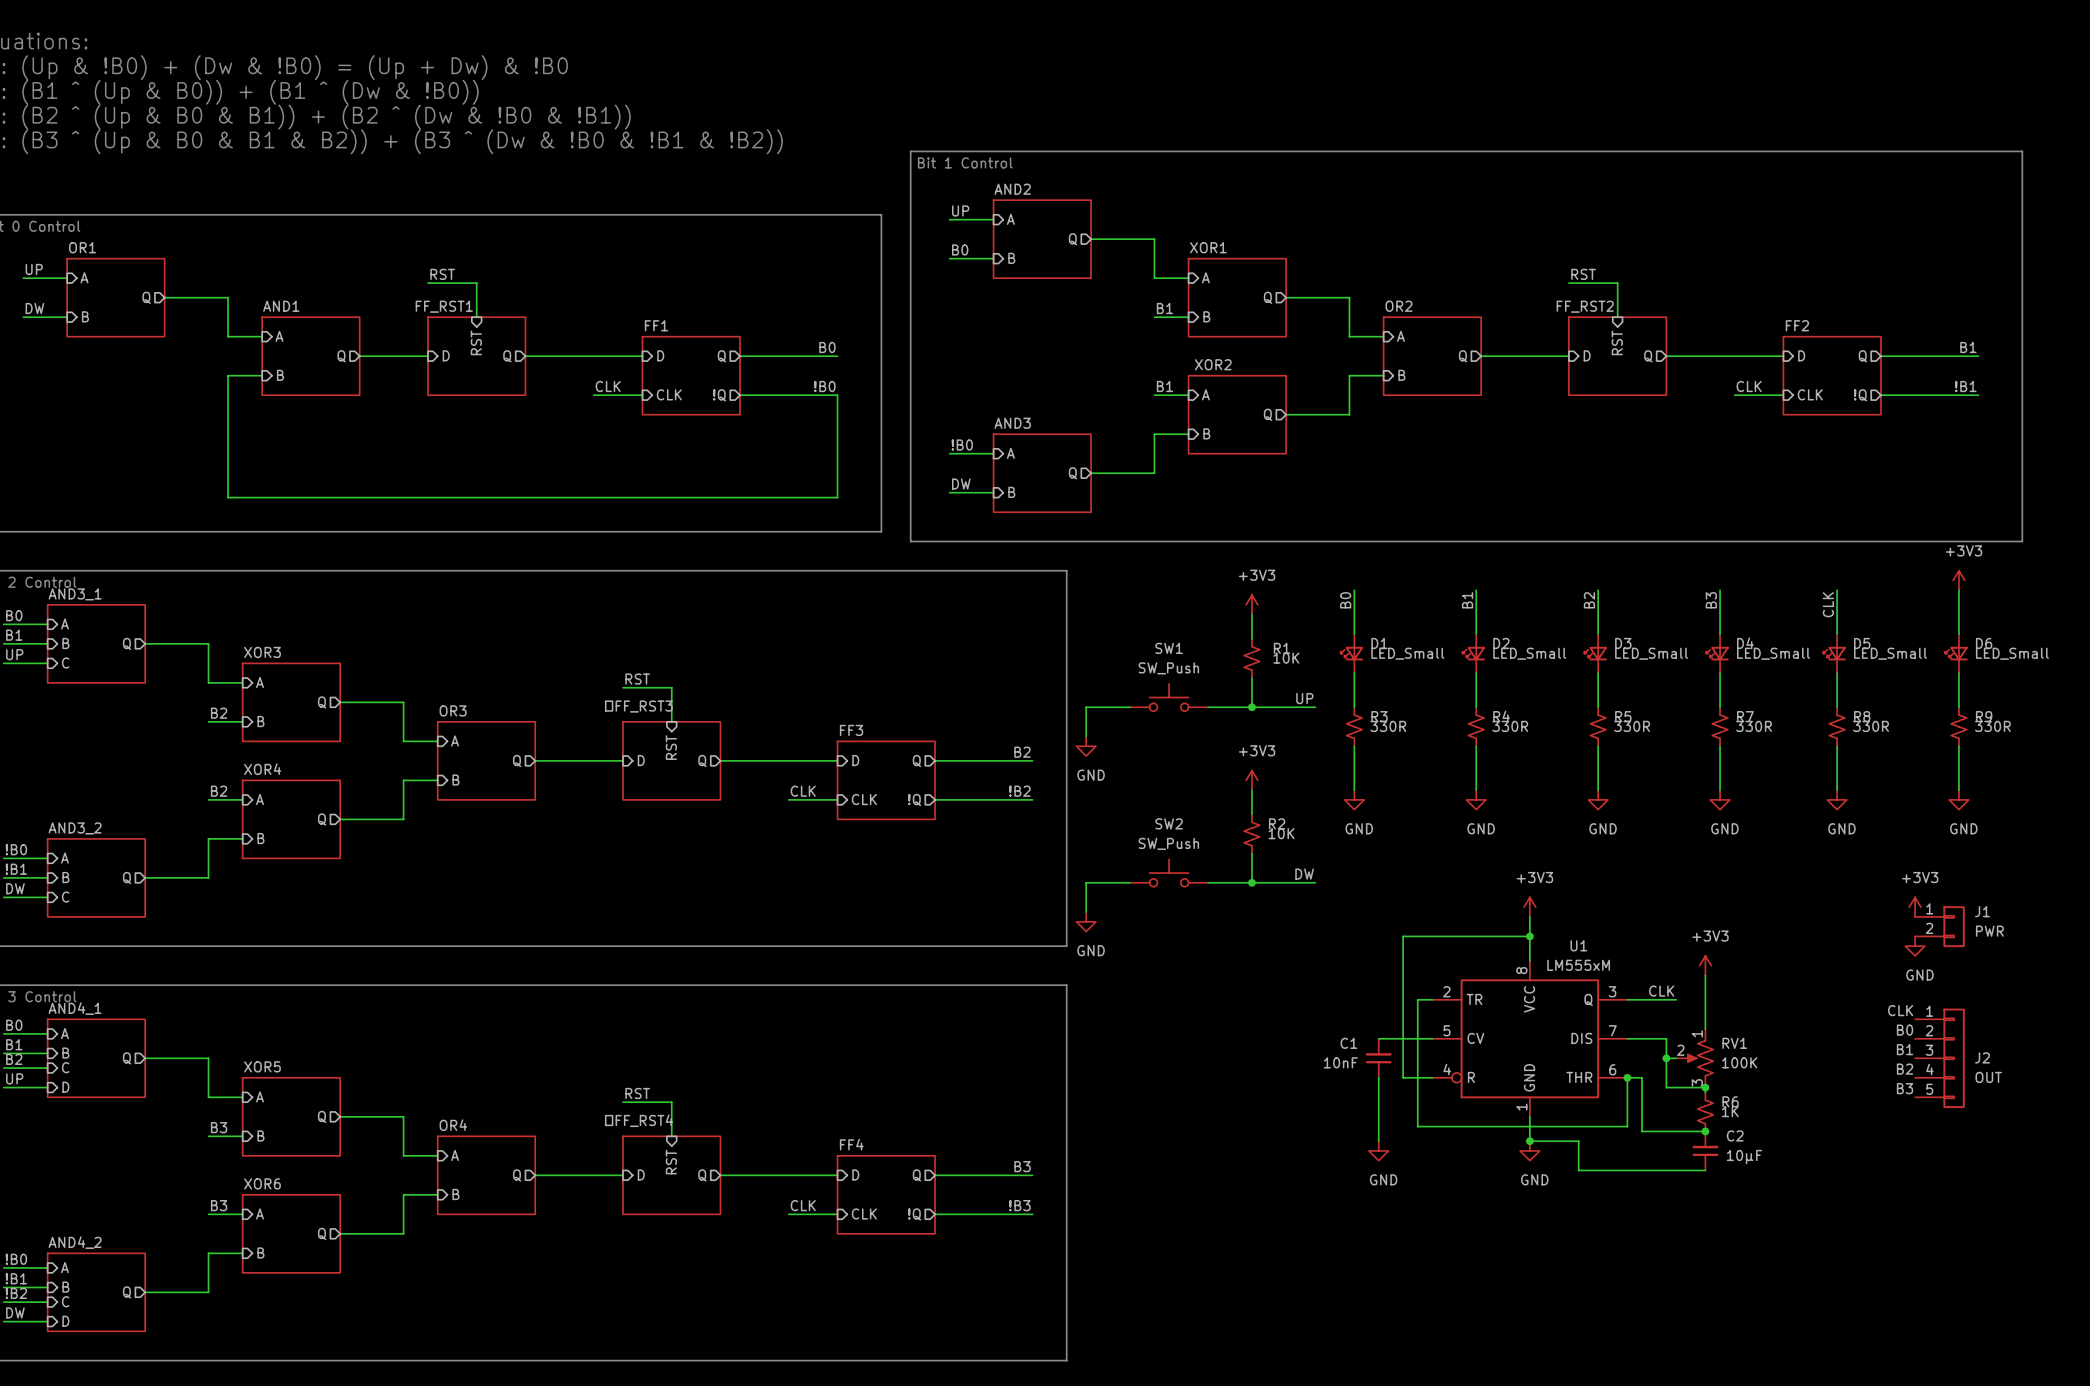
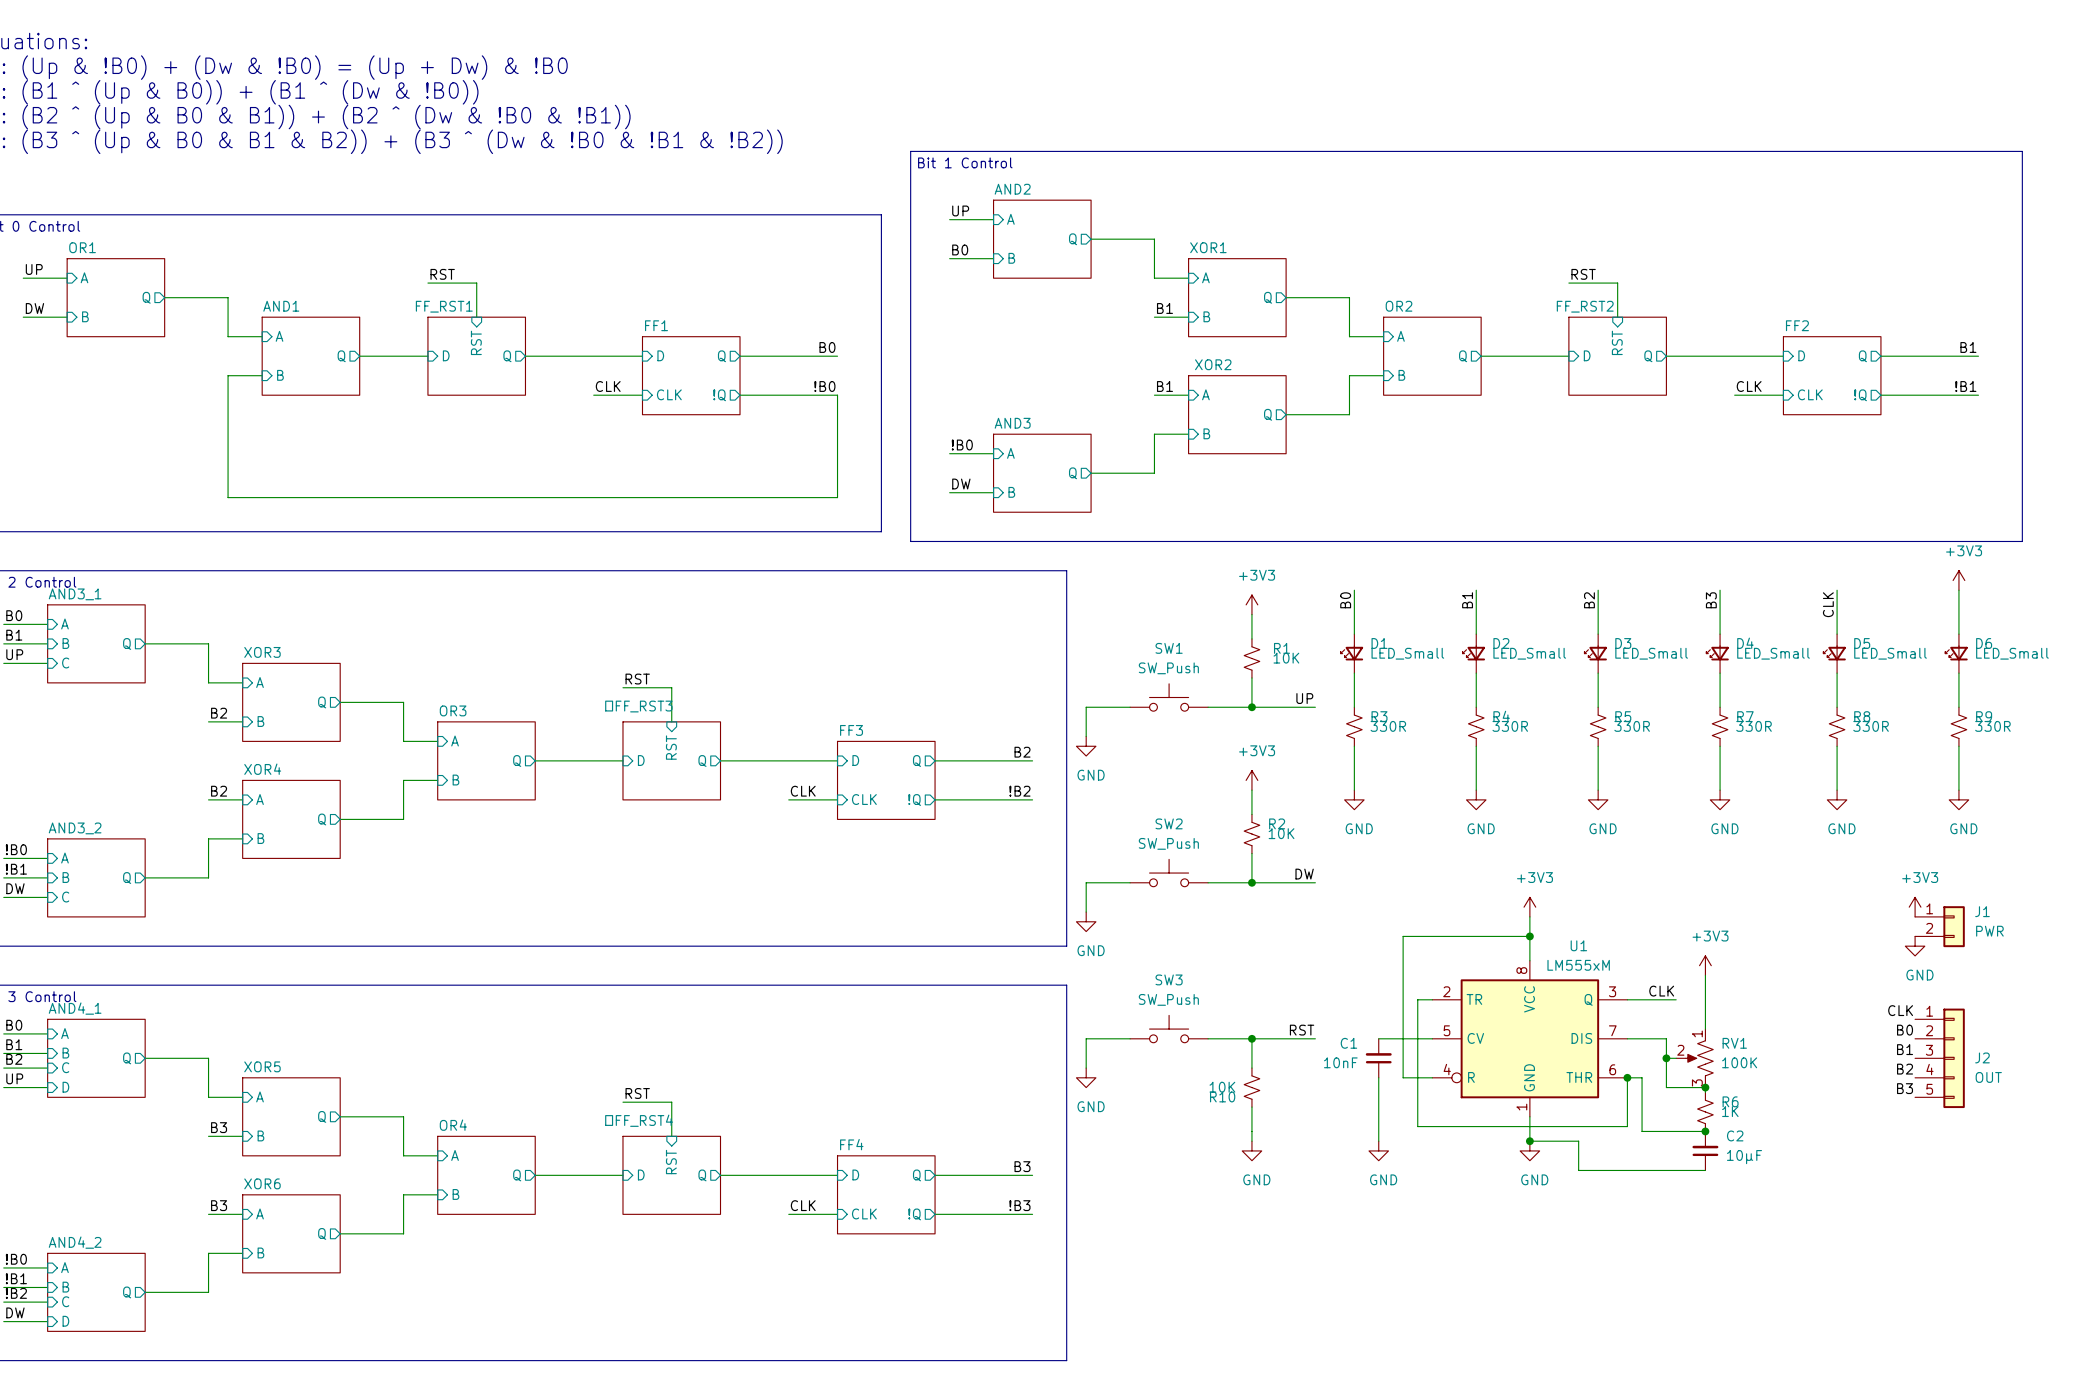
SW3: none -> SW_Push (1169, 1029)
label: none -> RST (1302, 1030)
wire: none -> (1130, 1038) (1086, 1038) (1086, 1068)
wire: none -> (1208, 1038) (1315, 1038)
wire: none -> (1251, 1038) (1251, 1068)
junction: none -> (1251, 1038)
power symbol: none -> GND (1086, 1077)
R10: none -> 10K (1251, 1087)
wire: none -> (1251, 1107) (1251, 1141)
power symbol: none -> GND (1251, 1150)

